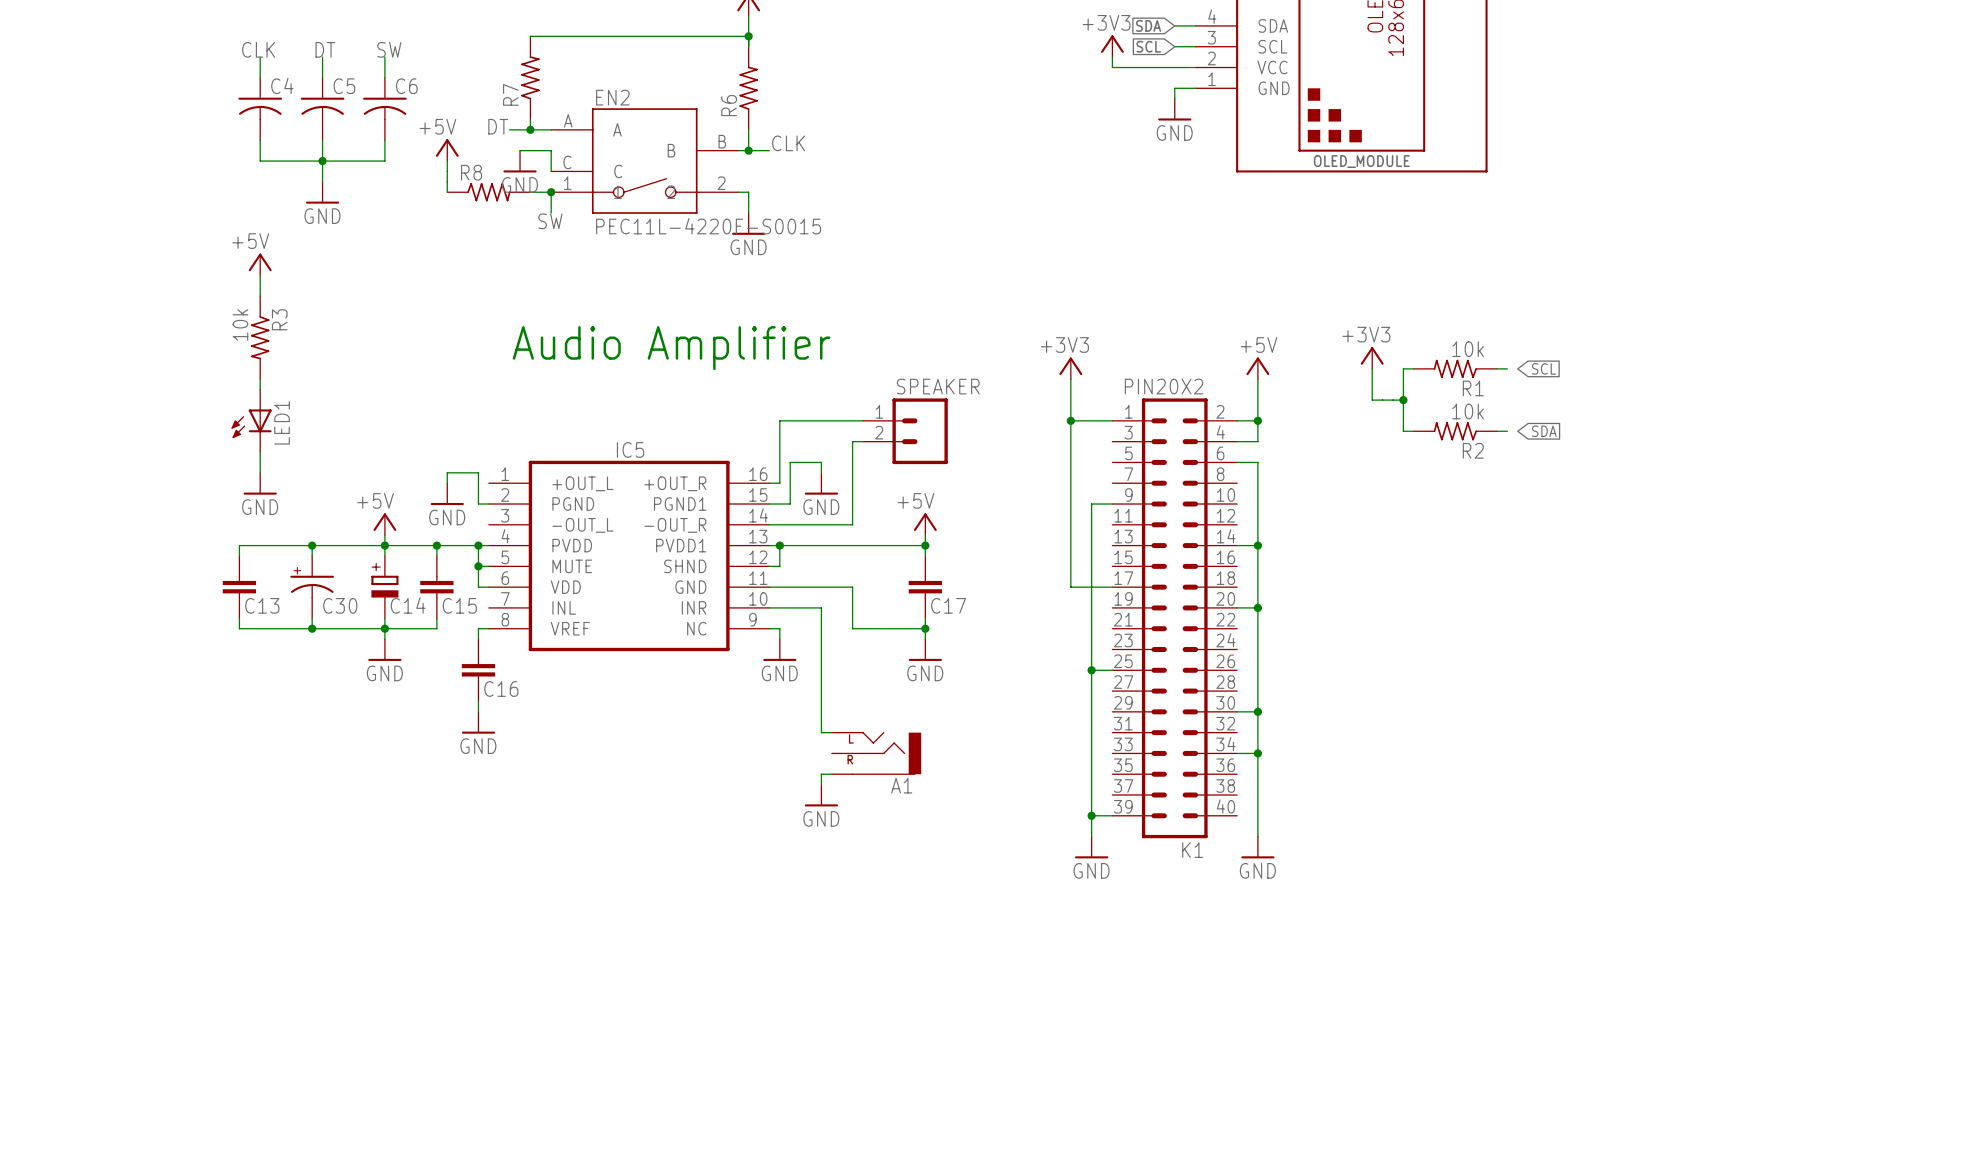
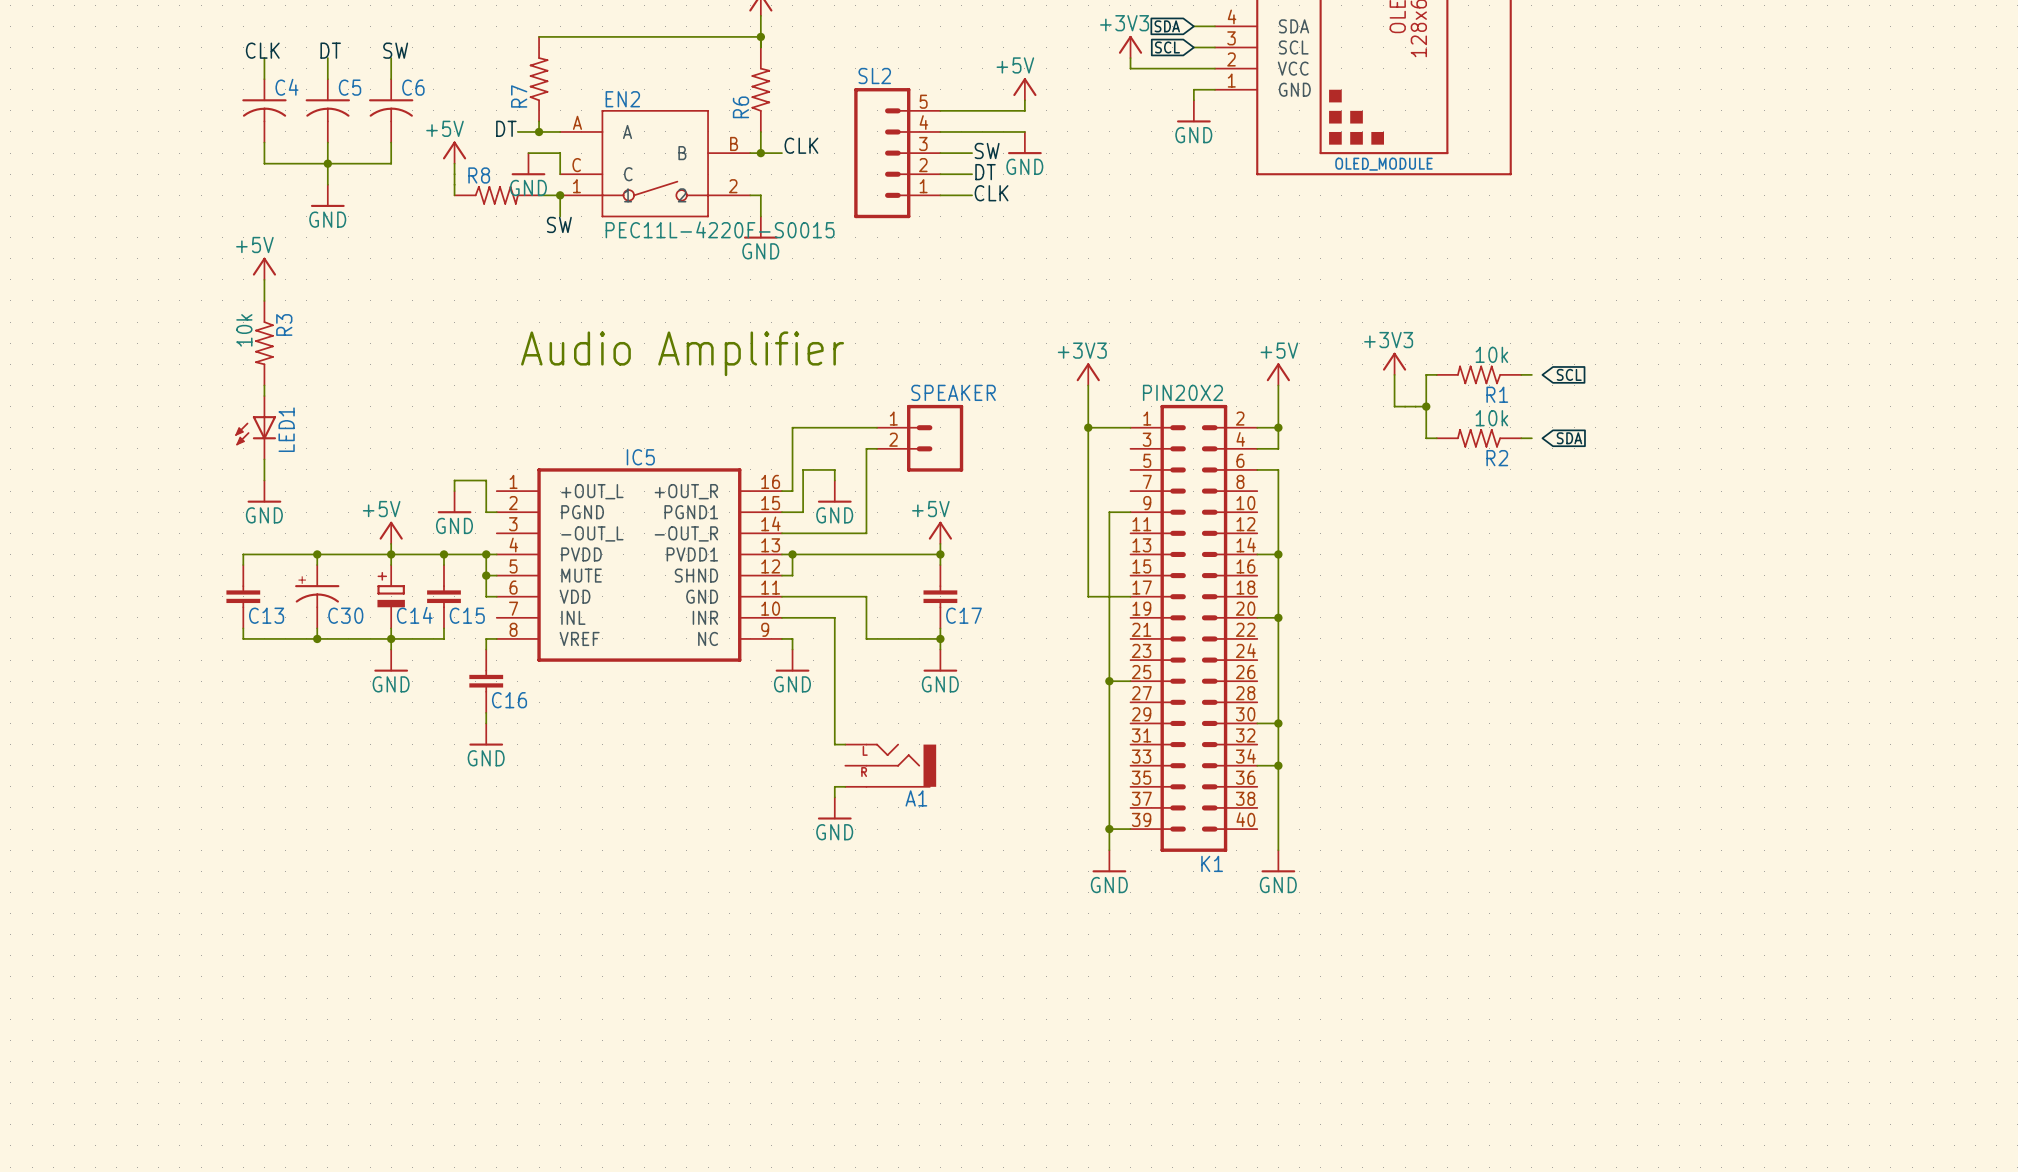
power symbol: none -> +5V (1024, 89)
wire: none -> (1024, 100) (1024, 110) (940, 110)
wire: none -> (940, 131) (1024, 131)
power symbol: none -> GND (1024, 143)
label: none -> SW (987, 150)
SL2: none -> (897, 153)
wire: none -> (940, 153) (972, 153)
label: none -> DT (985, 172)
wire: none -> (940, 174) (972, 174)
label: none -> CLK (991, 193)
wire: none -> (940, 195) (972, 195)

